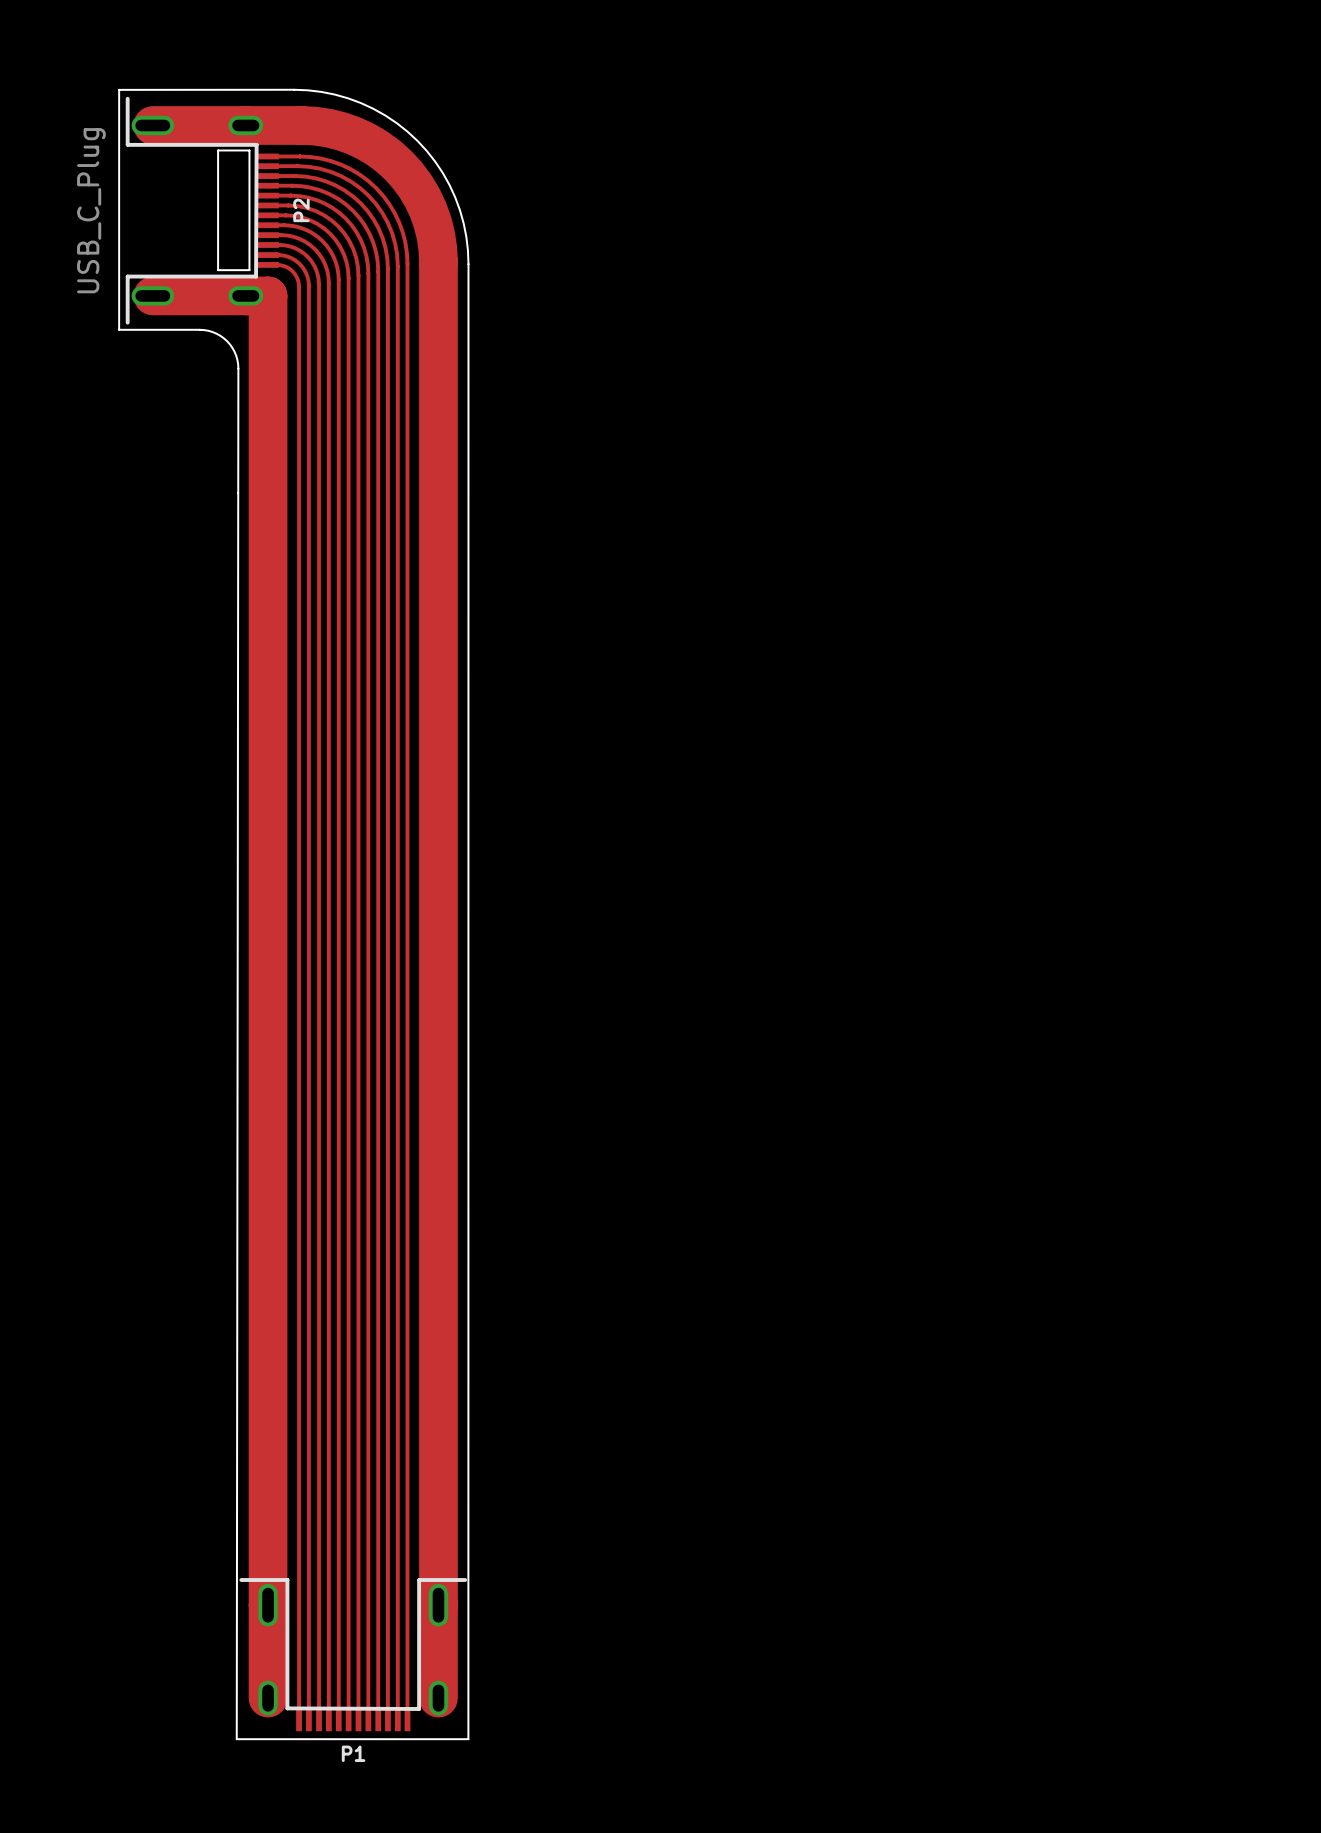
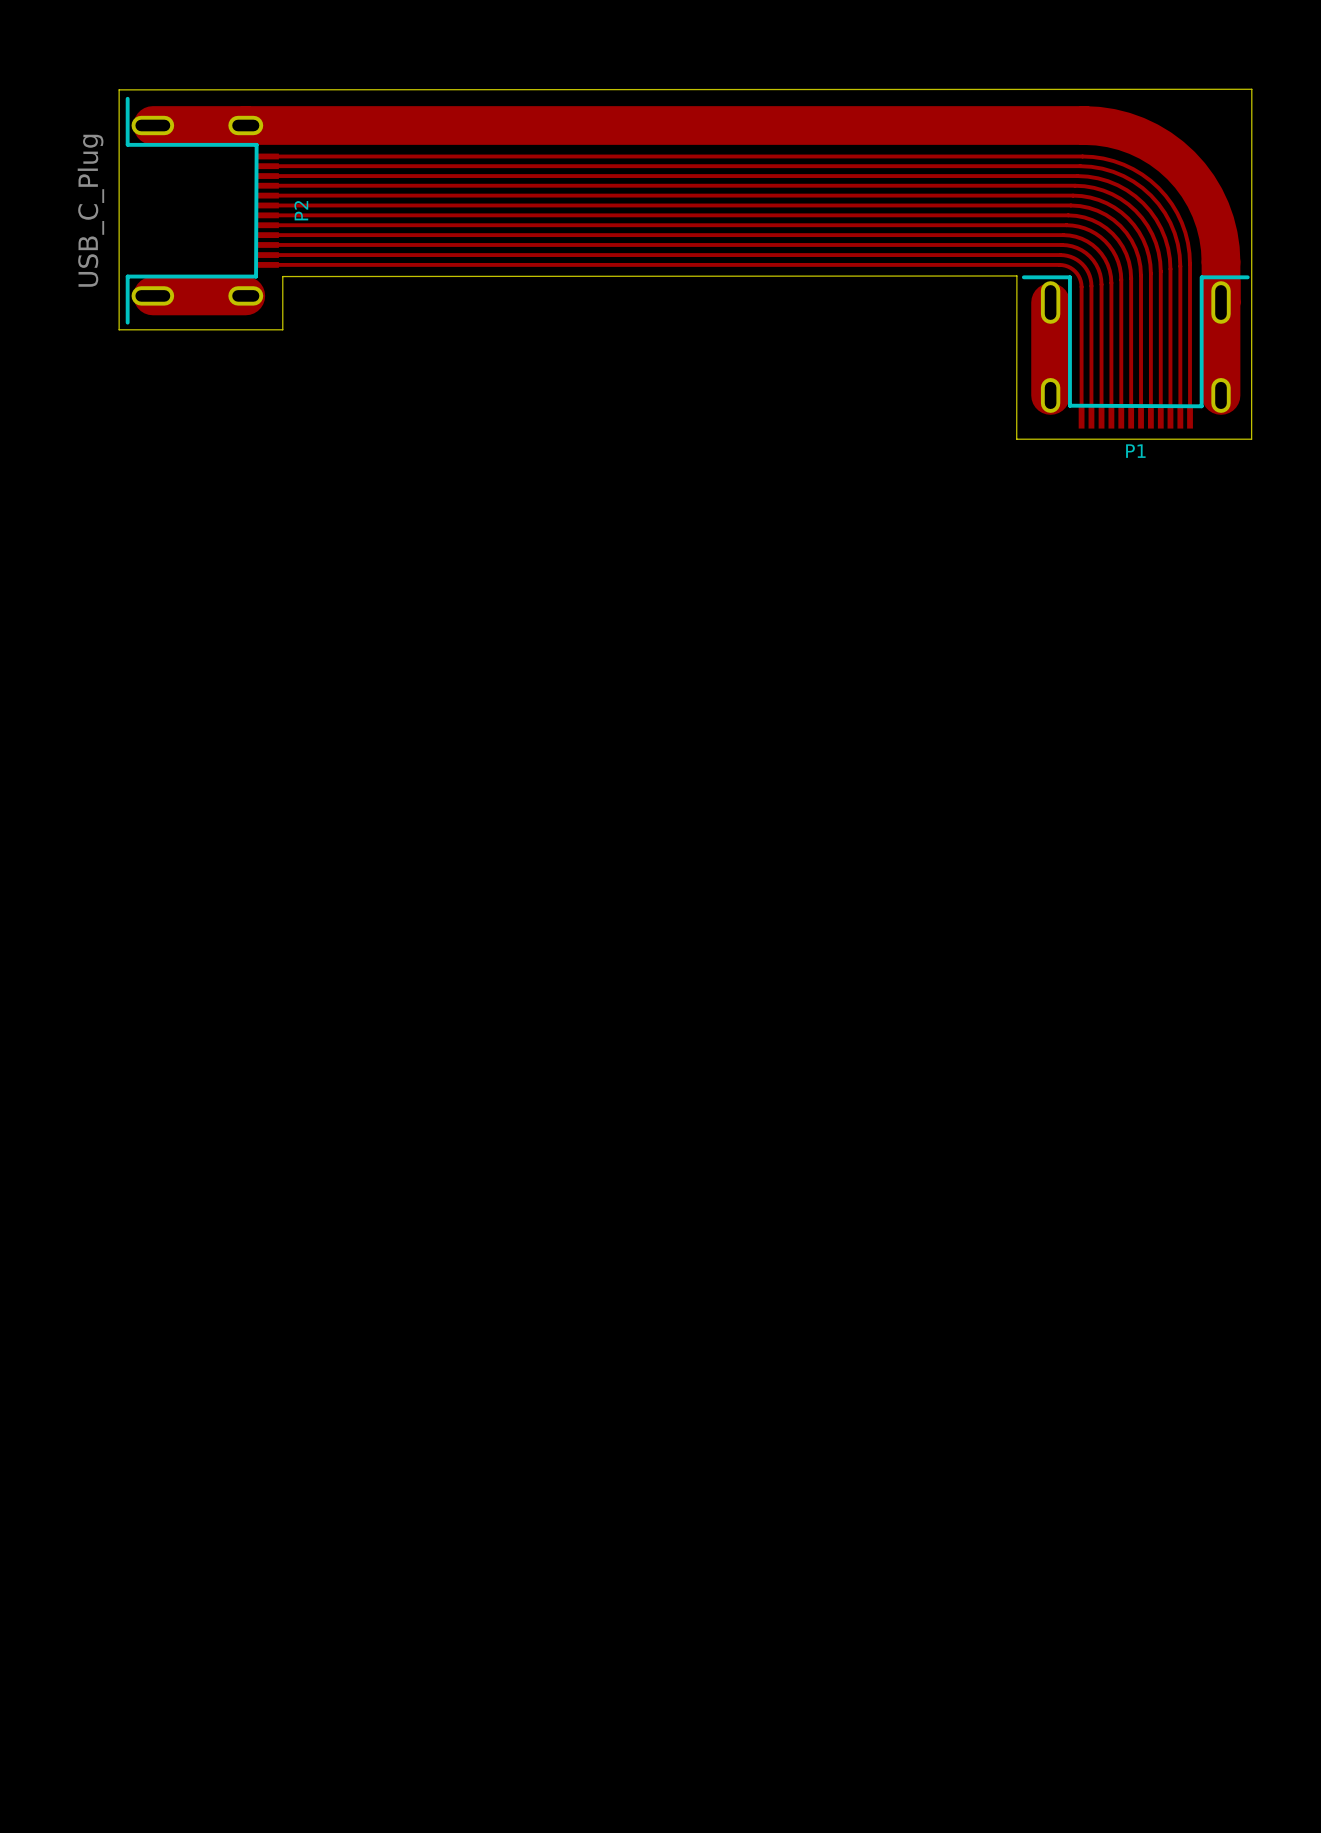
board edge: (294, 89) (321, 91) (348, 98) (373, 108) (407, 131) (435, 161) (449, 184) (463, 223) (467, 250) (468, 1739) (236, 1739) (238, 368) (236, 355) (227, 341) (212, 331) (199, 329) -> (294, 89) (1251, 89) (1251, 439) (1016, 439) (1016, 275) (282, 276) (282, 329) (199, 329)
track: (301, 125) (328, 128) (354, 135) (377, 148) (398, 165) (422, 197) (432, 222) (437, 248) (438, 1698) -> (301, 125) (1084, 125) (1124, 131) (1148, 141) (1171, 156) (1197, 186) (1210, 209) (1220, 248) (1221, 395)
board edge: (218, 150) (249, 150) (249, 270) (218, 270) (218, 150) -> none
track: (300, 156) (321, 158) (341, 164) (368, 180) (383, 195) (394, 213) (402, 232) (406, 253) (407, 1720) -> (300, 156) (1082, 156) (1113, 161) (1142, 174) (1158, 187) (1171, 204) (1185, 232) (1190, 263) (1190, 417)
track: (297, 166) (330, 171) (360, 188) (375, 203) (387, 222) (397, 255) (397, 1720) -> (297, 166) (1080, 166) (1102, 168) (1123, 176) (1142, 188) (1158, 203) (1174, 233) (1180, 266) (1180, 417)
track: (294, 176) (325, 181) (344, 190) (360, 203) (378, 228) (387, 258) (387, 1720) -> (294, 176) (1077, 176) (1098, 178) (1126, 190) (1143, 203) (1156, 219) (1165, 238) (1170, 269) (1170, 417)
track: (292, 185) (311, 187) (329, 194) (353, 210) (369, 234) (376, 252) (378, 271) (378, 1720) -> (292, 185) (1075, 185) (1094, 187) (1112, 194) (1128, 204) (1142, 218) (1155, 243) (1160, 271) (1160, 417)
track: (290, 195) (307, 197) (324, 203) (345, 218) (360, 239) (366, 256) (368, 273) (368, 1720) -> (290, 195) (1073, 195) (1090, 197) (1114, 207) (1128, 218) (1138, 232) (1148, 256) (1150, 273) (1150, 417)
track: (288, 205) (315, 210) (337, 226) (353, 248) (358, 275) (358, 1720) -> (288, 205) (1070, 205) (1089, 207) (1105, 214) (1120, 226) (1131, 240) (1138, 257) (1141, 275) (1141, 417)
track: (285, 215) (309, 220) (330, 233) (343, 254) (348, 278) (348, 1720) -> (285, 215) (1068, 215) (1084, 217) (1099, 223) (1112, 233) (1122, 246) (1129, 261) (1131, 278) (1131, 417)
track: (284, 225) (302, 228) (322, 241) (335, 261) (338, 279) (338, 1720) -> (284, 225) (1078, 226) (1090, 230) (1105, 241) (1115, 256) (1119, 267) (1121, 417)
track: (281, 235) (299, 238) (314, 249) (325, 264) (328, 282) (328, 1720) -> (280, 235) (1063, 235) (1075, 236) (1087, 241) (1097, 249) (1107, 264) (1110, 276) (1111, 417)
track: (279, 244) (294, 247) (307, 256) (315, 269) (318, 284) (318, 1720) -> (279, 244) (1072, 246) (1089, 256) (1096, 264) (1101, 279) (1101, 417)
track: (277, 255) (291, 258) (299, 264) (305, 272) (308, 286) (308, 1720) -> (277, 255) (1067, 255) (1082, 264) (1088, 272) (1091, 282) (1091, 417)
track: (277, 264) (284, 266) (292, 271) (297, 279) (299, 286) (299, 1720) -> (277, 264) (1062, 265) (1075, 271) (1081, 284) (1081, 417)
track: (245, 295) (268, 295) (268, 1698) -> none
track: none -> (1050, 302) (1050, 395)
P1 position: (353, 1654) -> (1135, 351)

